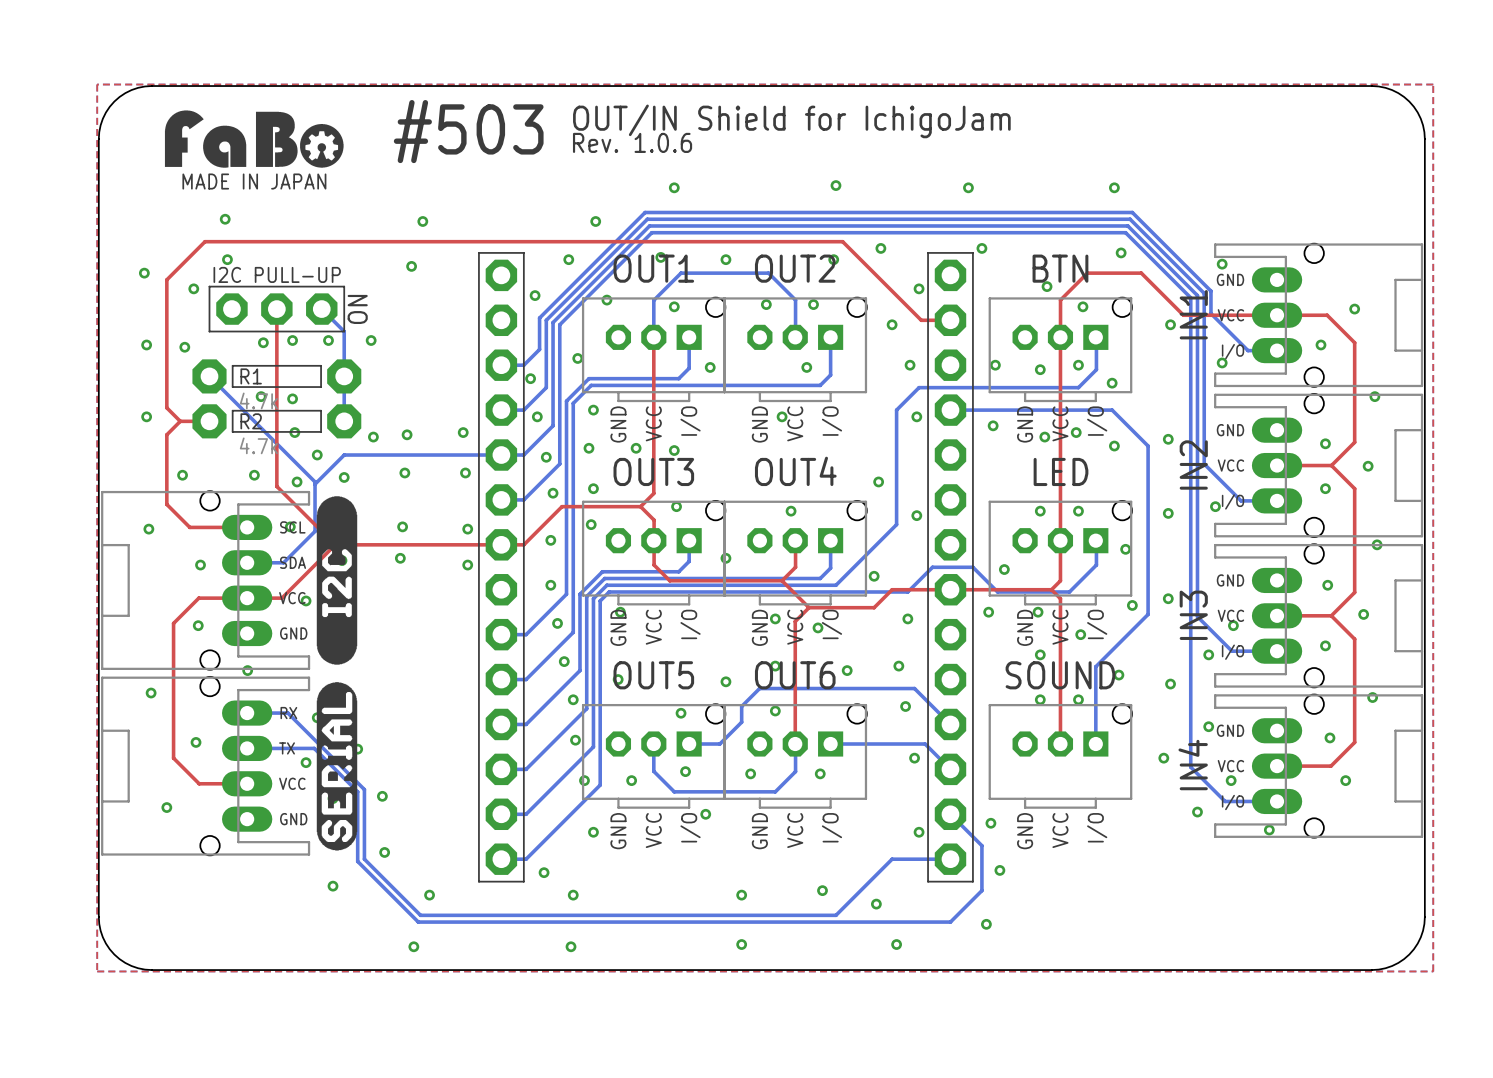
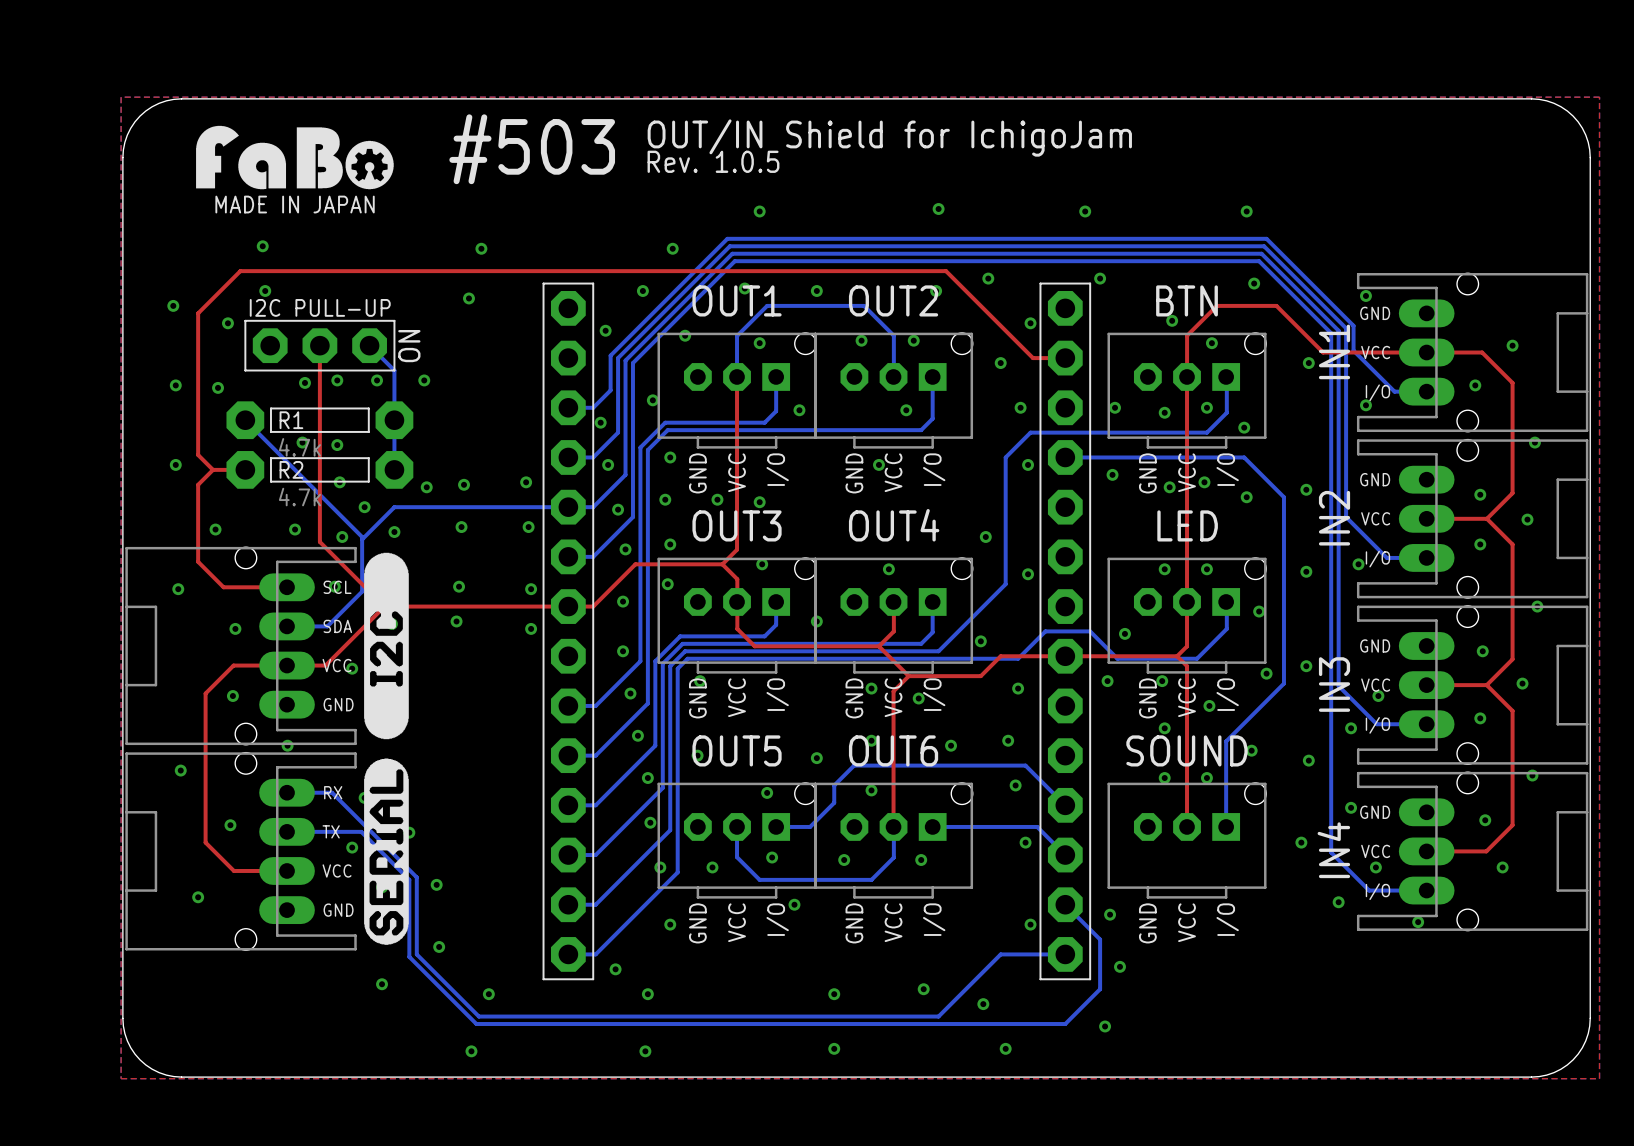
text: Rev. 1.0.6 (632, 142) -> Rev. 1.0.5 (713, 161)

